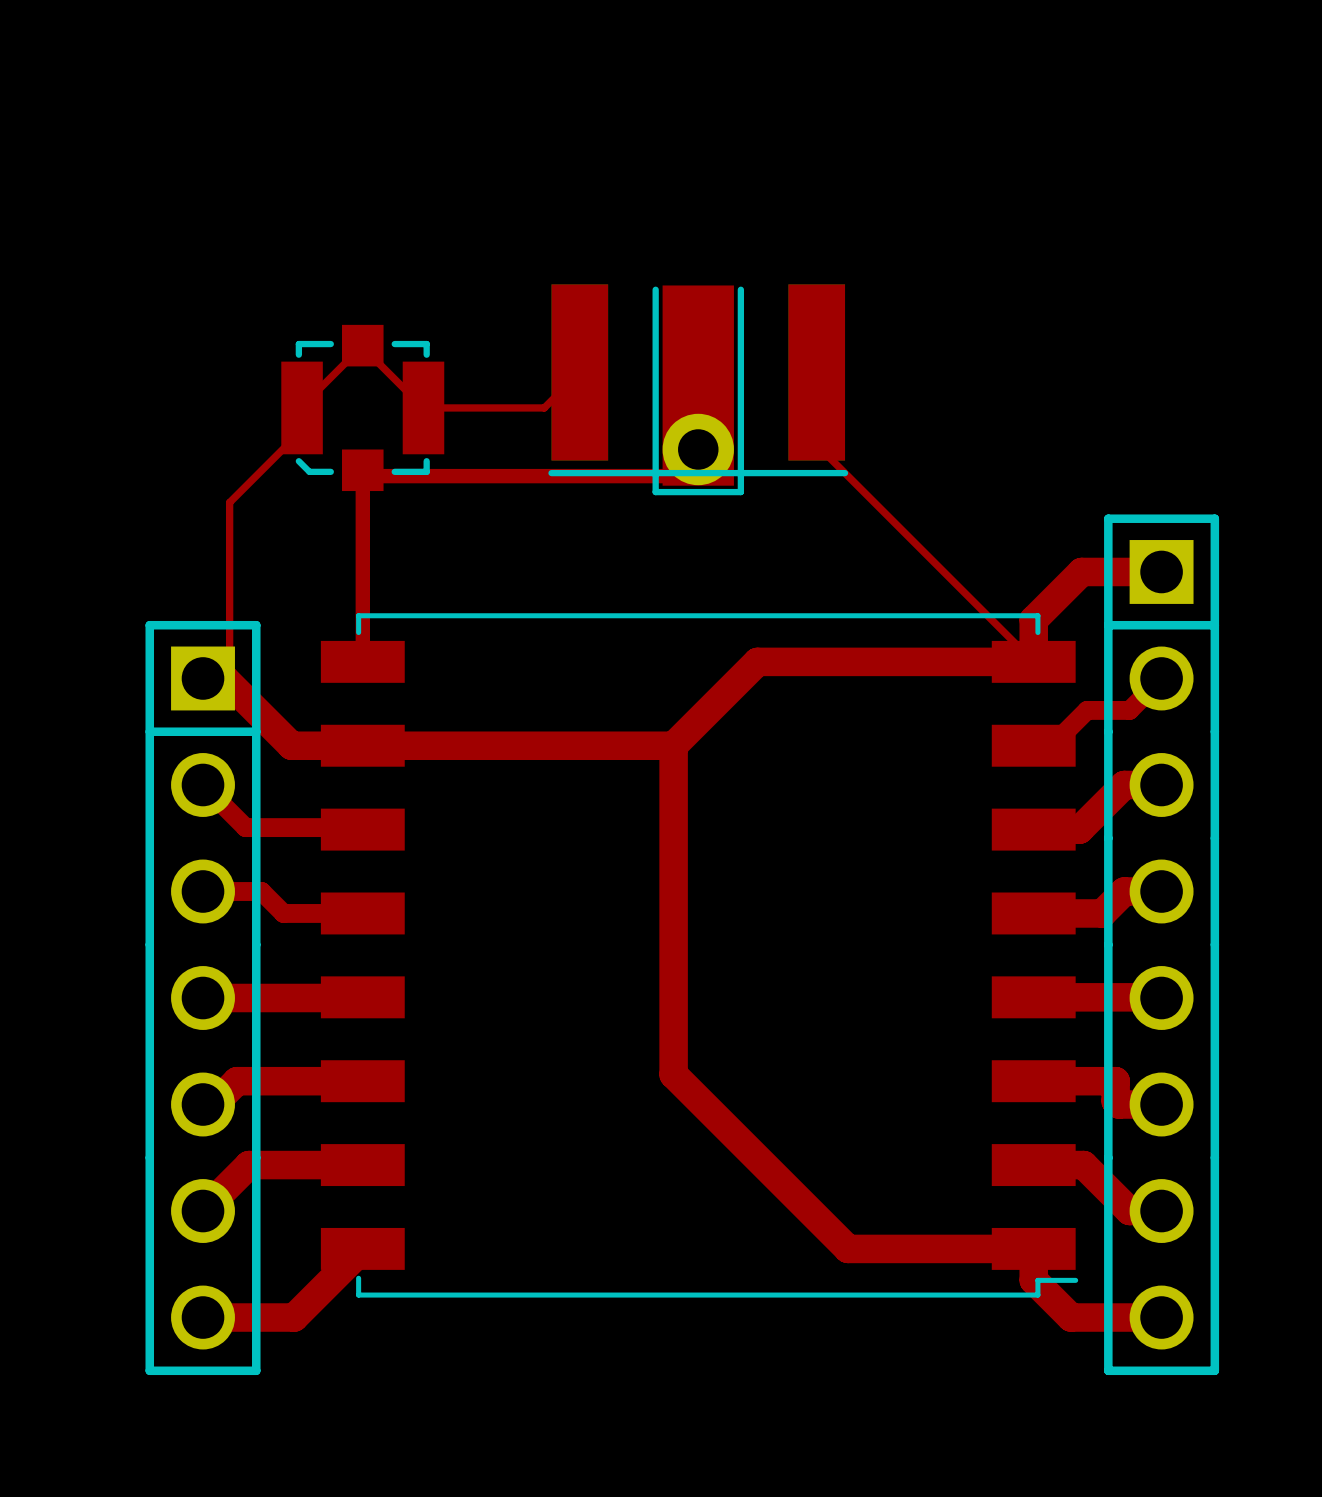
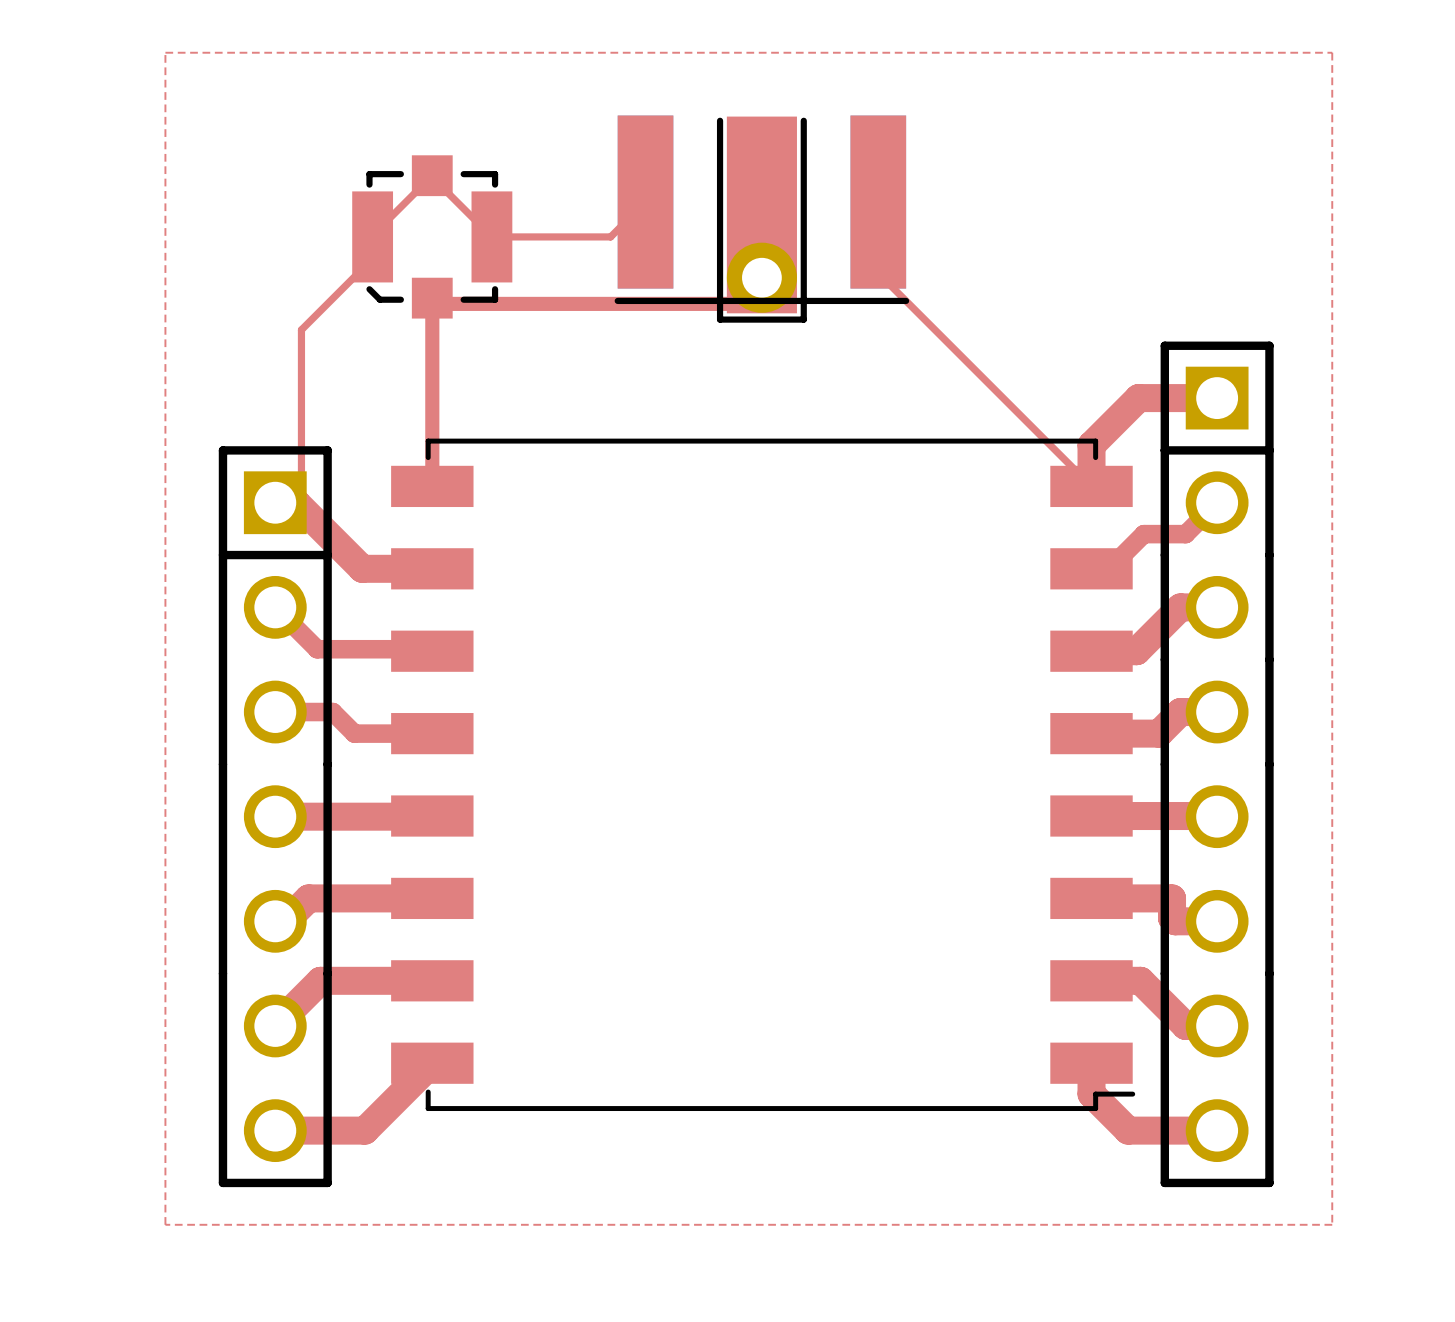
top zone outline: none -> (165, 52) (165, 1224) (1332, 1224) (1332, 52) (165, 52)
top track: (1033, 661) (757, 661) (673, 745) -> none
top track: (362, 745) (673, 745) -> none
top track: (673, 745) (673, 1074) (848, 1248) (1033, 1248) -> none

